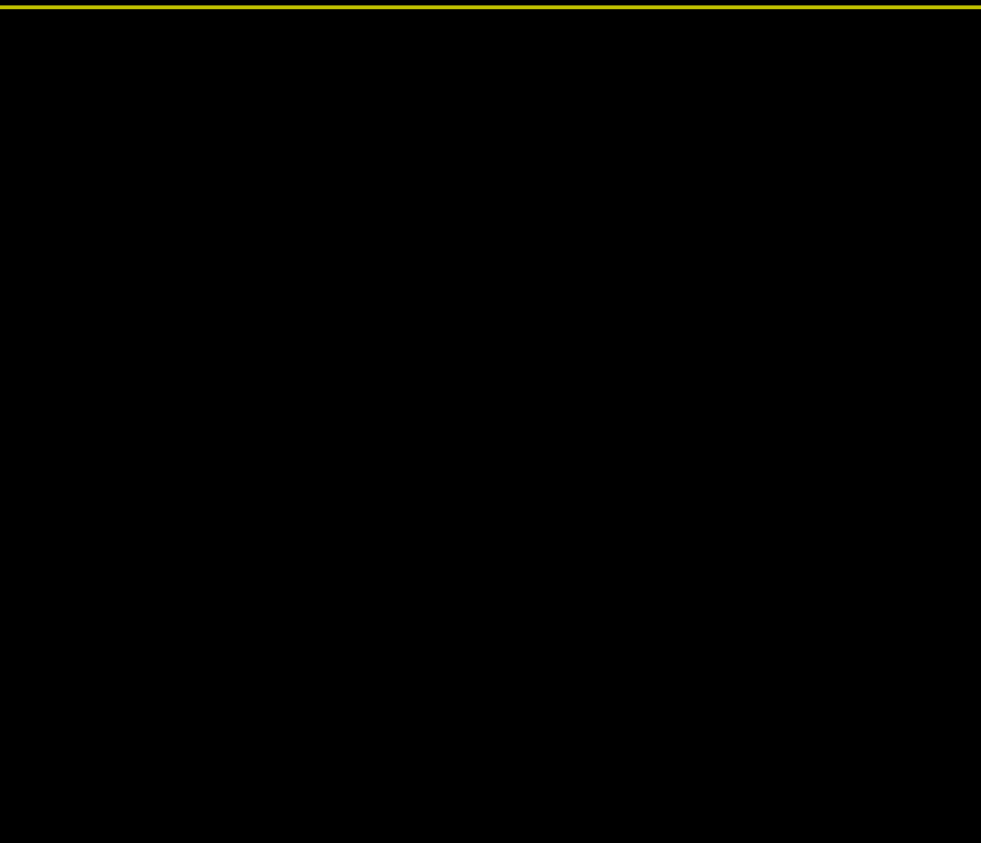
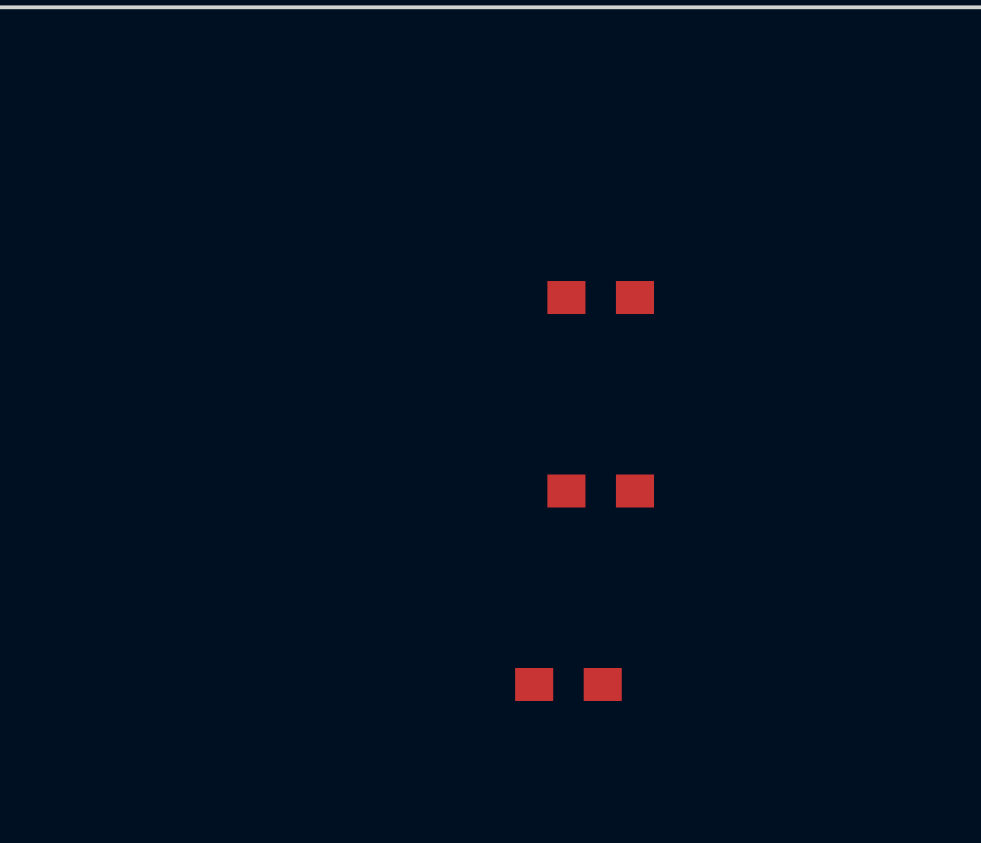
part: none -> (600, 297)
part: none -> (600, 491)
part: none -> (568, 684)

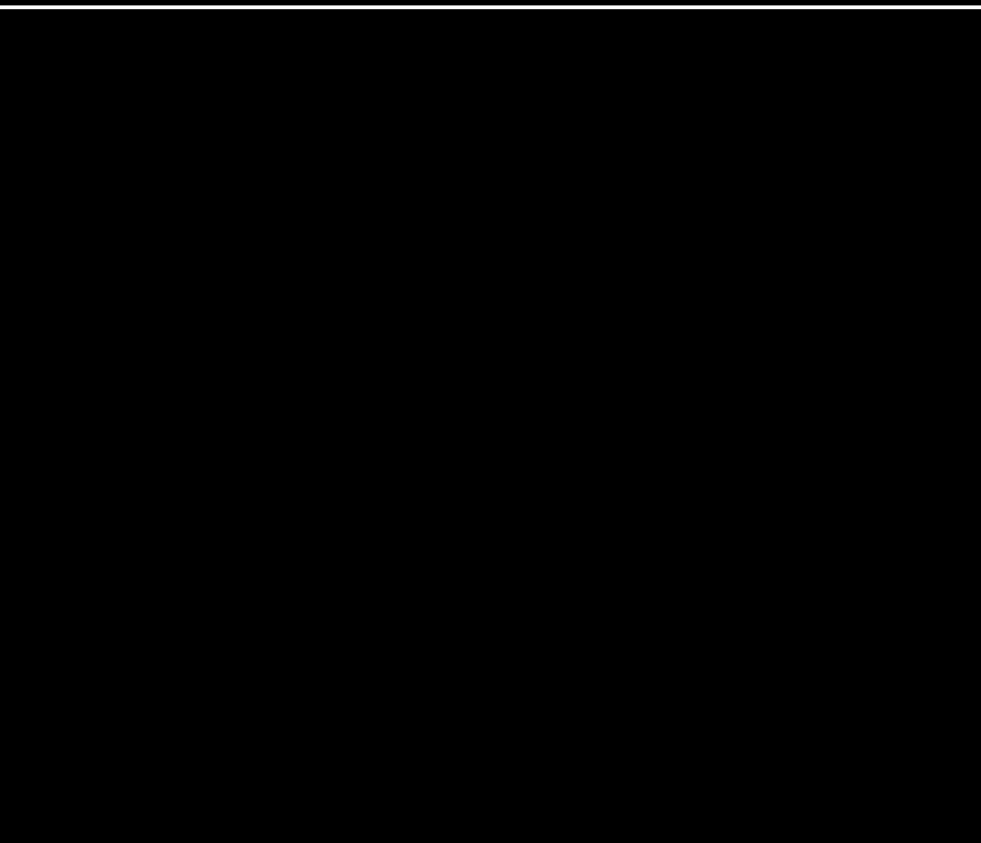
part: (600, 297) -> none
part: (600, 491) -> none
part: (568, 684) -> none

